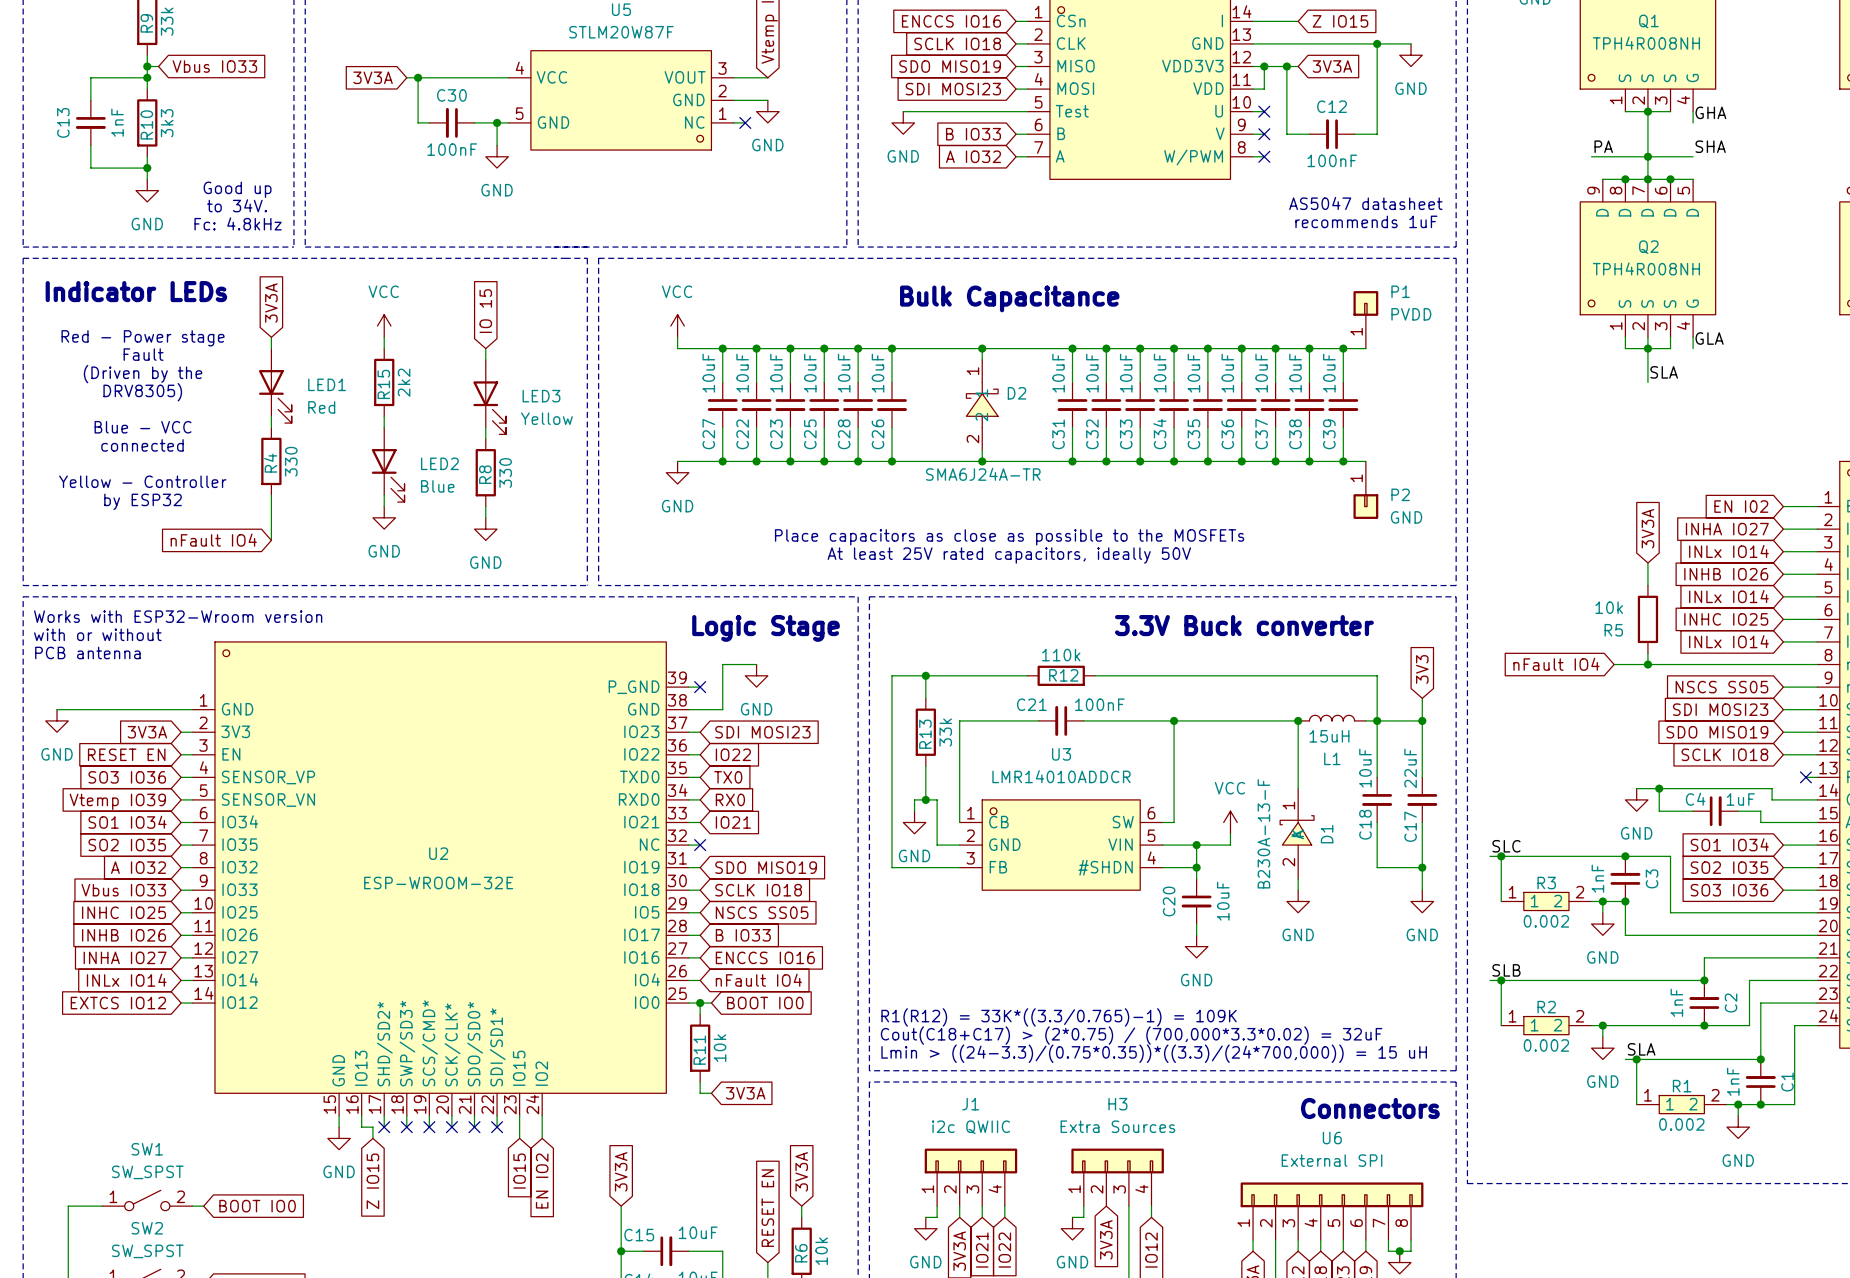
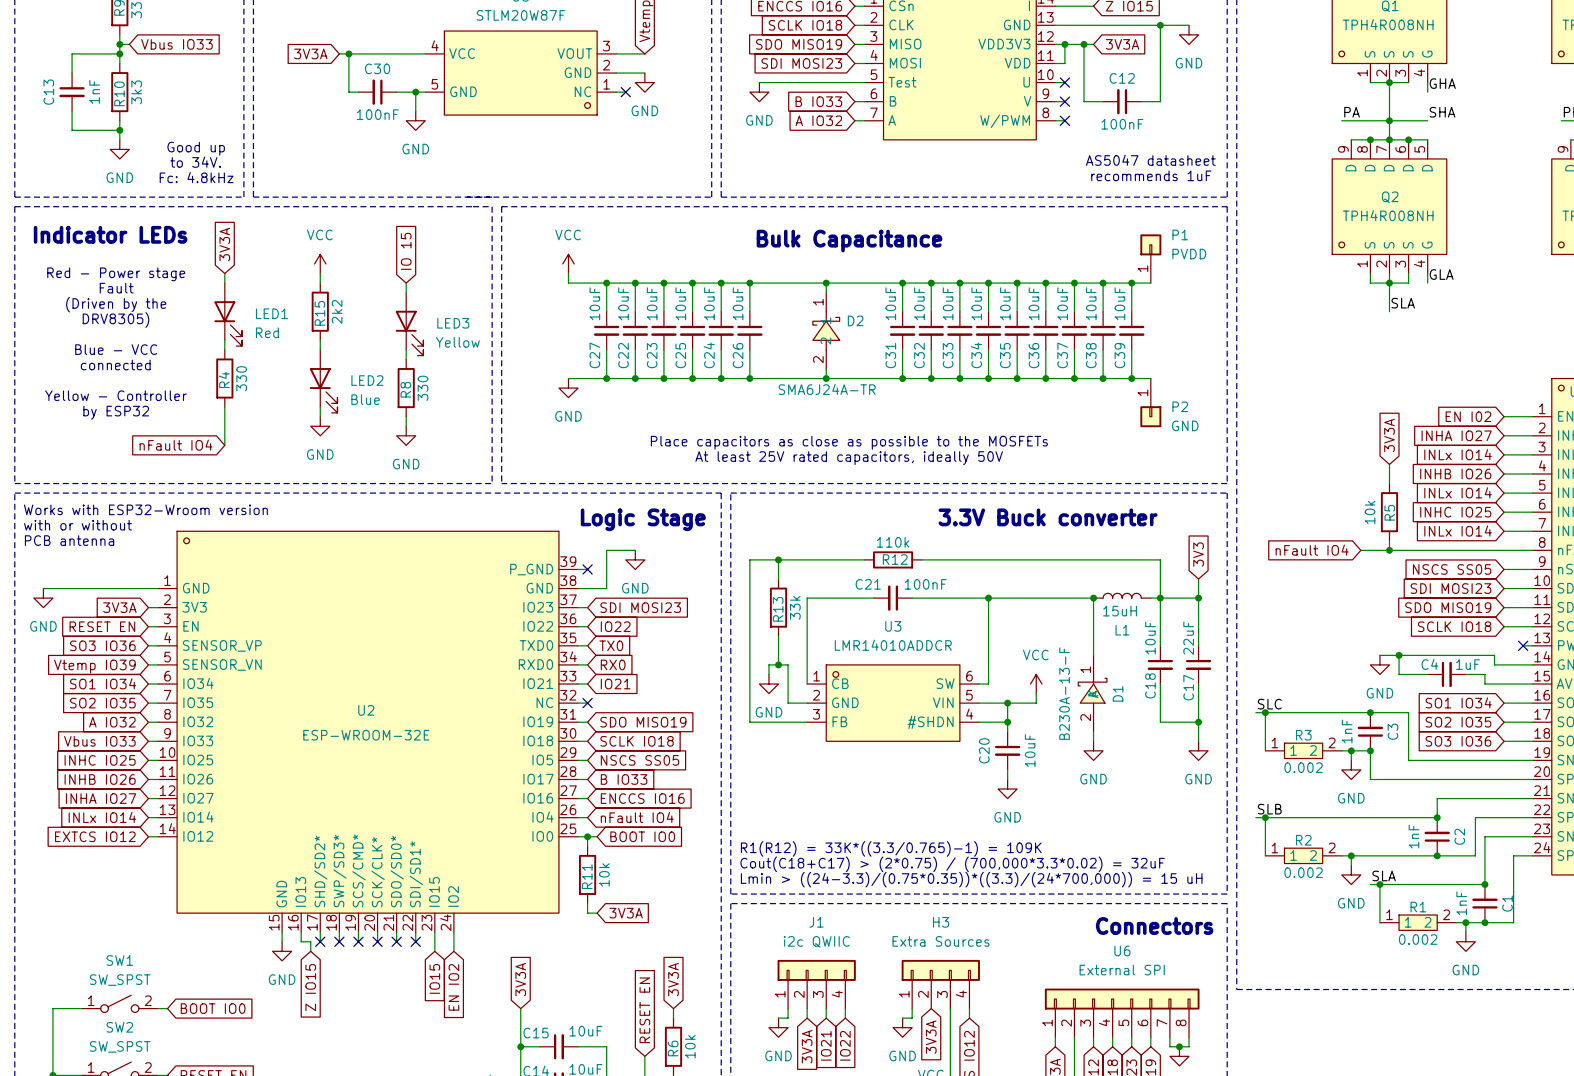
C28 name: C28 (844, 434) -> C24 (709, 355)
R5 value rotation: 0° (1609, 607) -> 90° counterclockwise (1370, 512)
R5 name rotation: 0° (1613, 630) -> 90° counterclockwise (1389, 512)
R5 name position: R5 (1613, 630) -> R5 (1389, 512)

